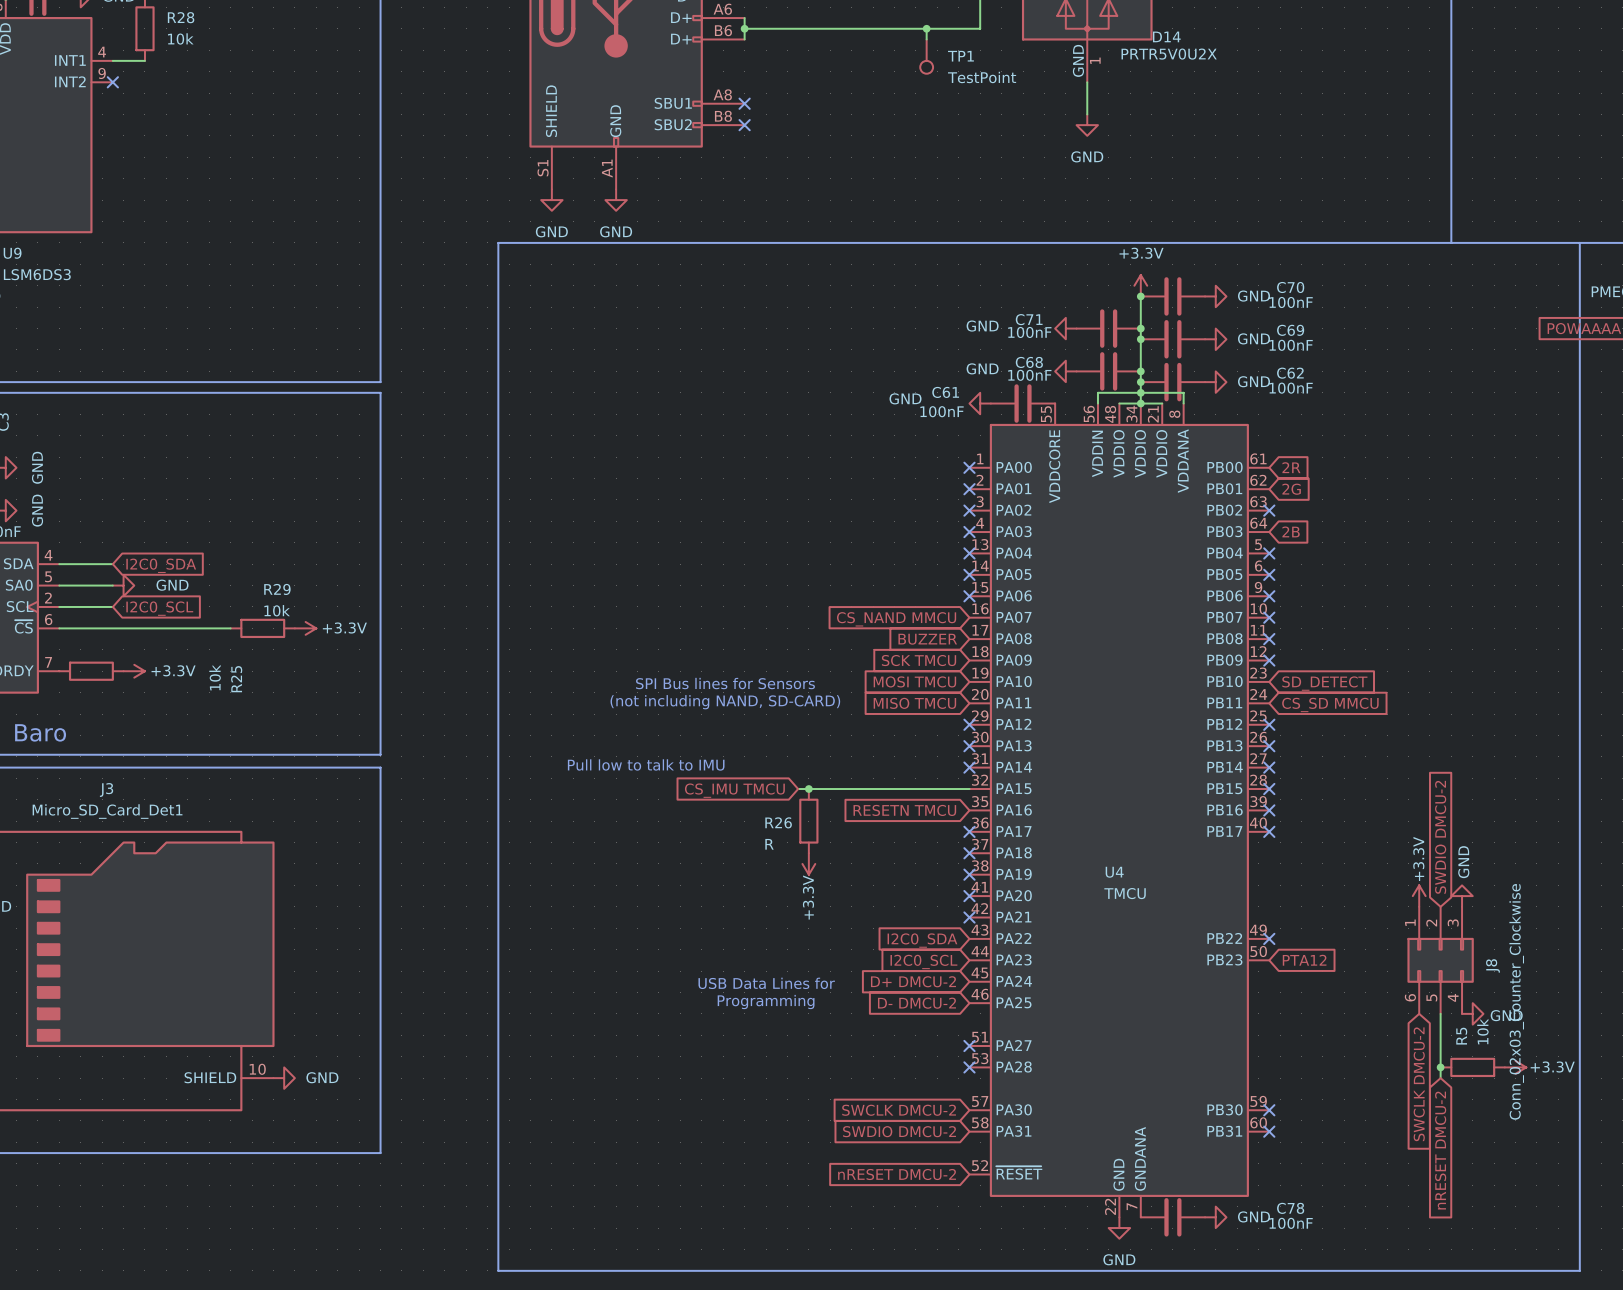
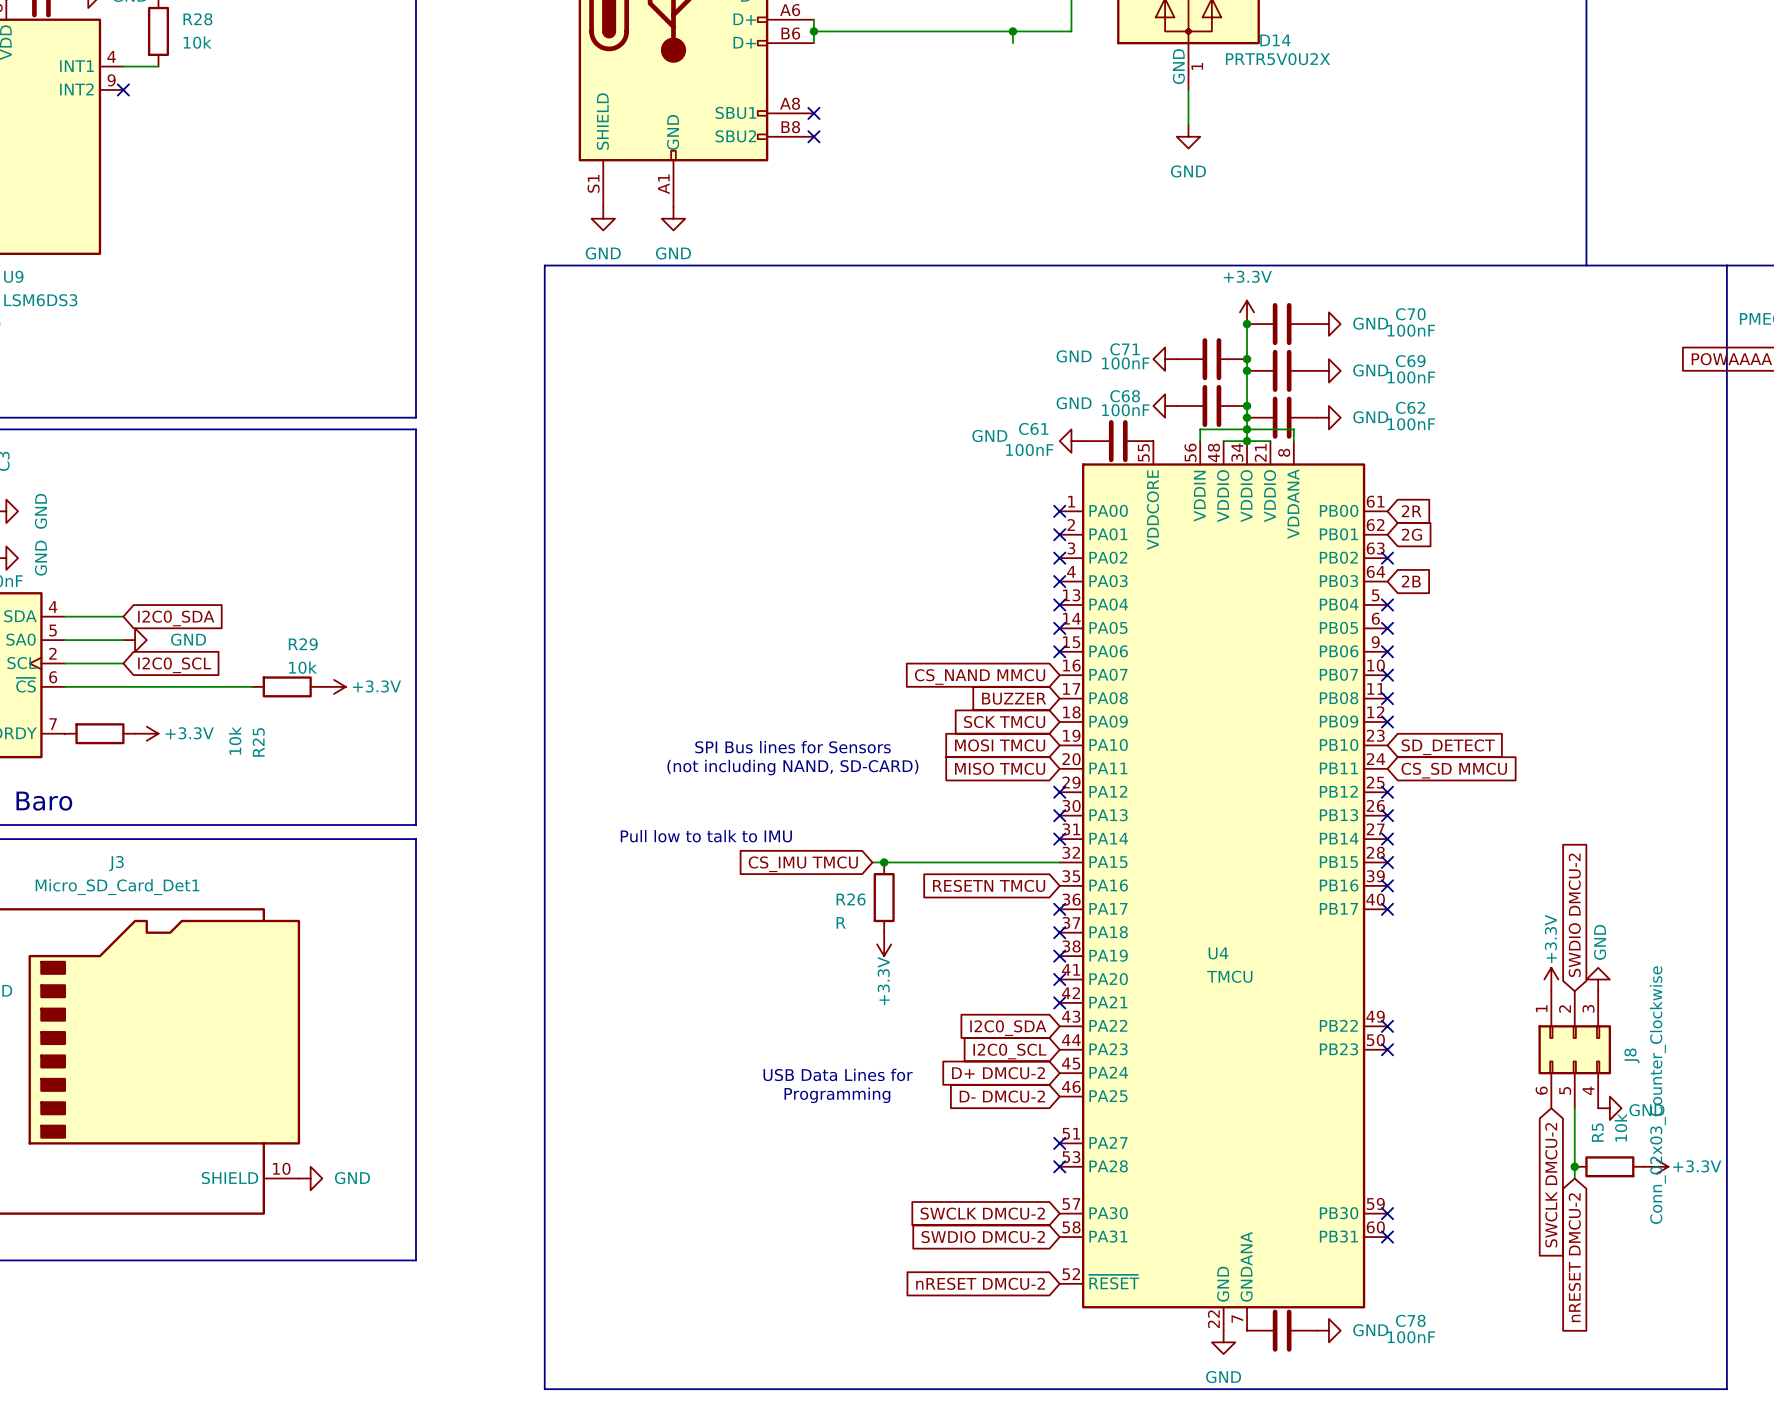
TP1: TestPoint (926, 56) -> none
no-connect mark: none -> (1387, 1049)
global label: PTA12 (1304, 960) -> none

